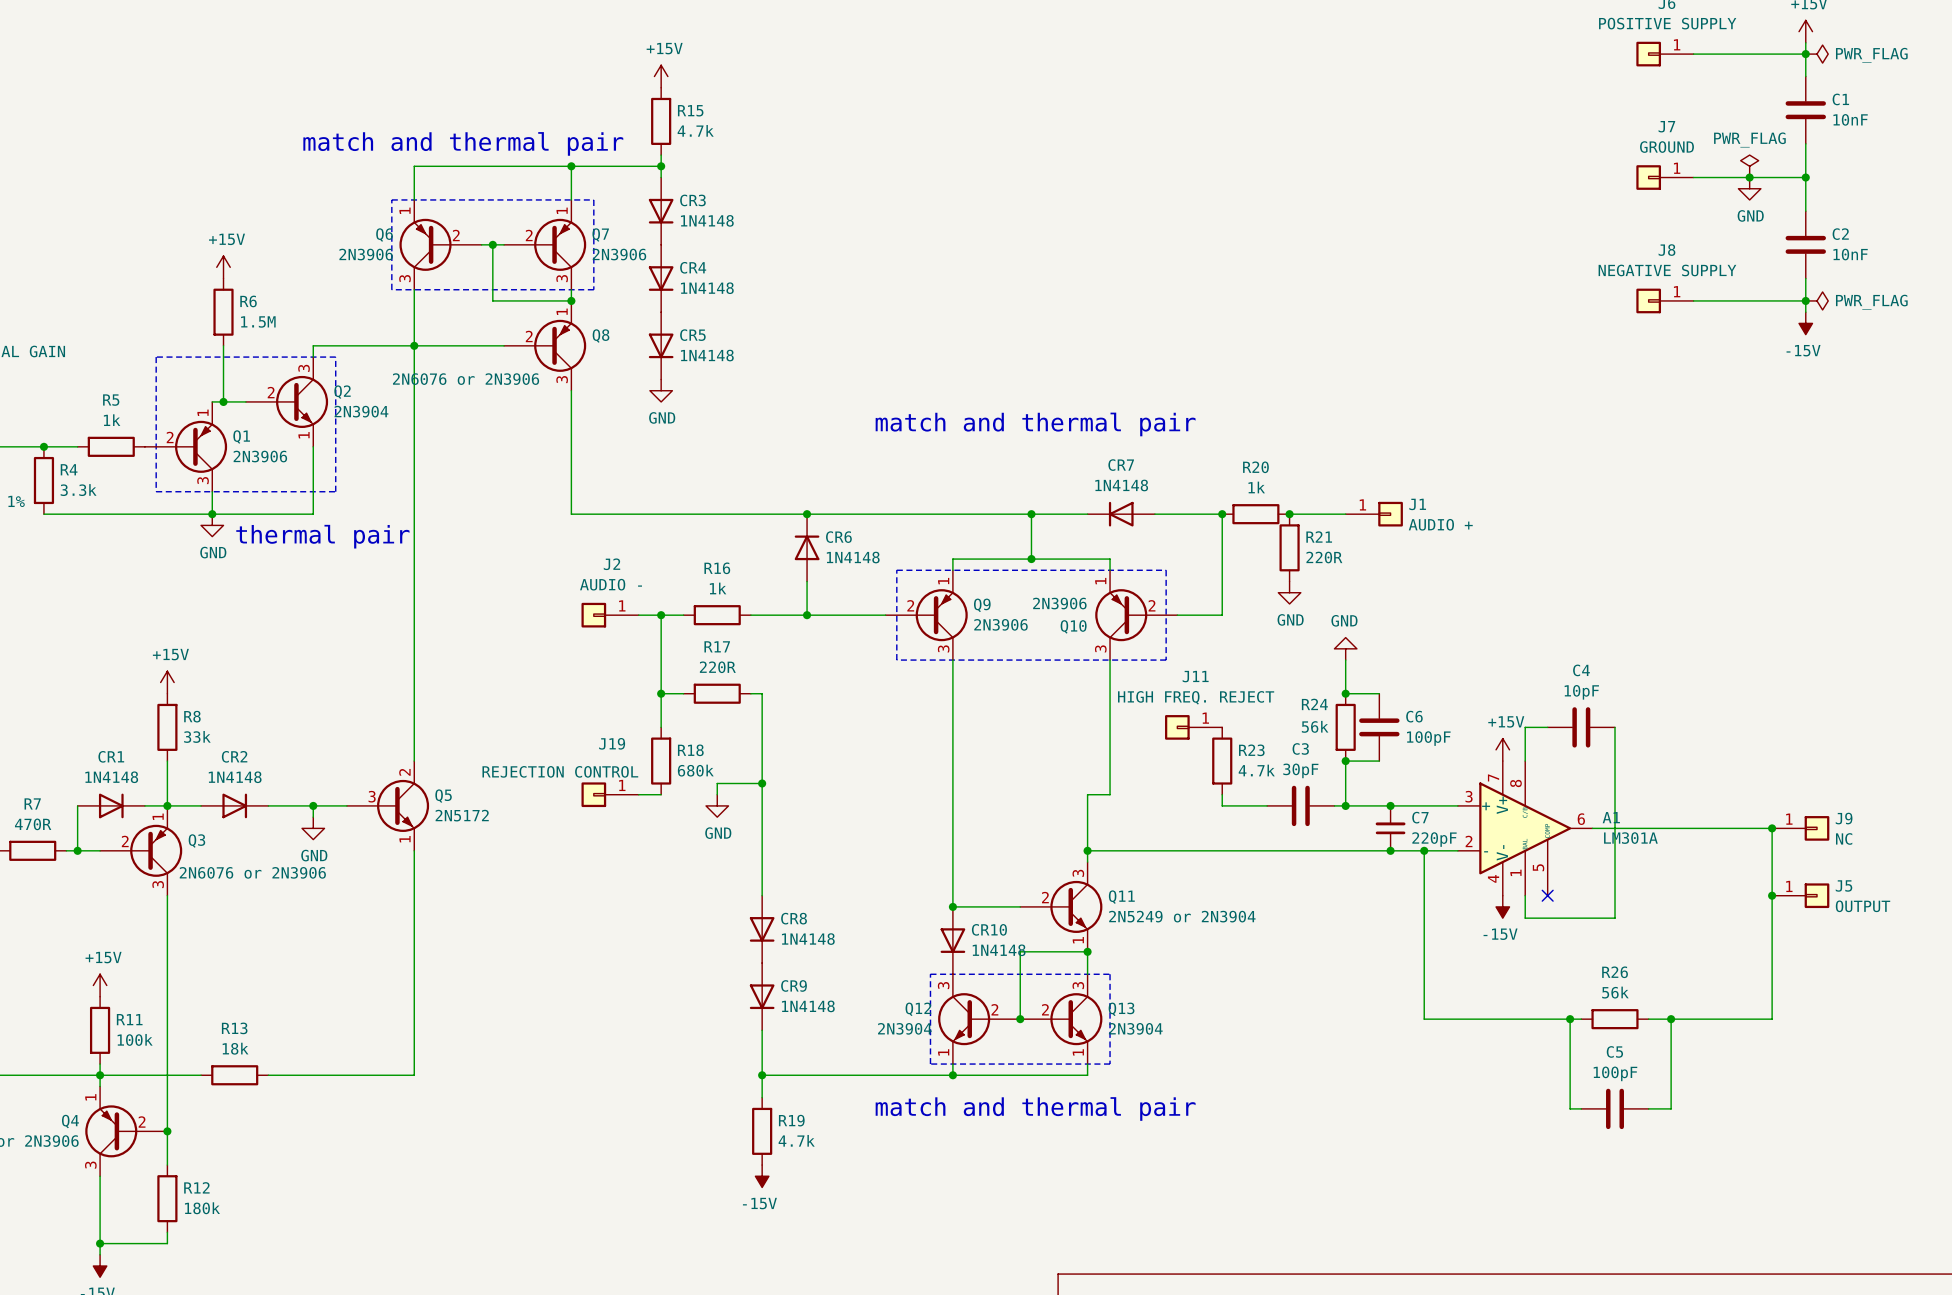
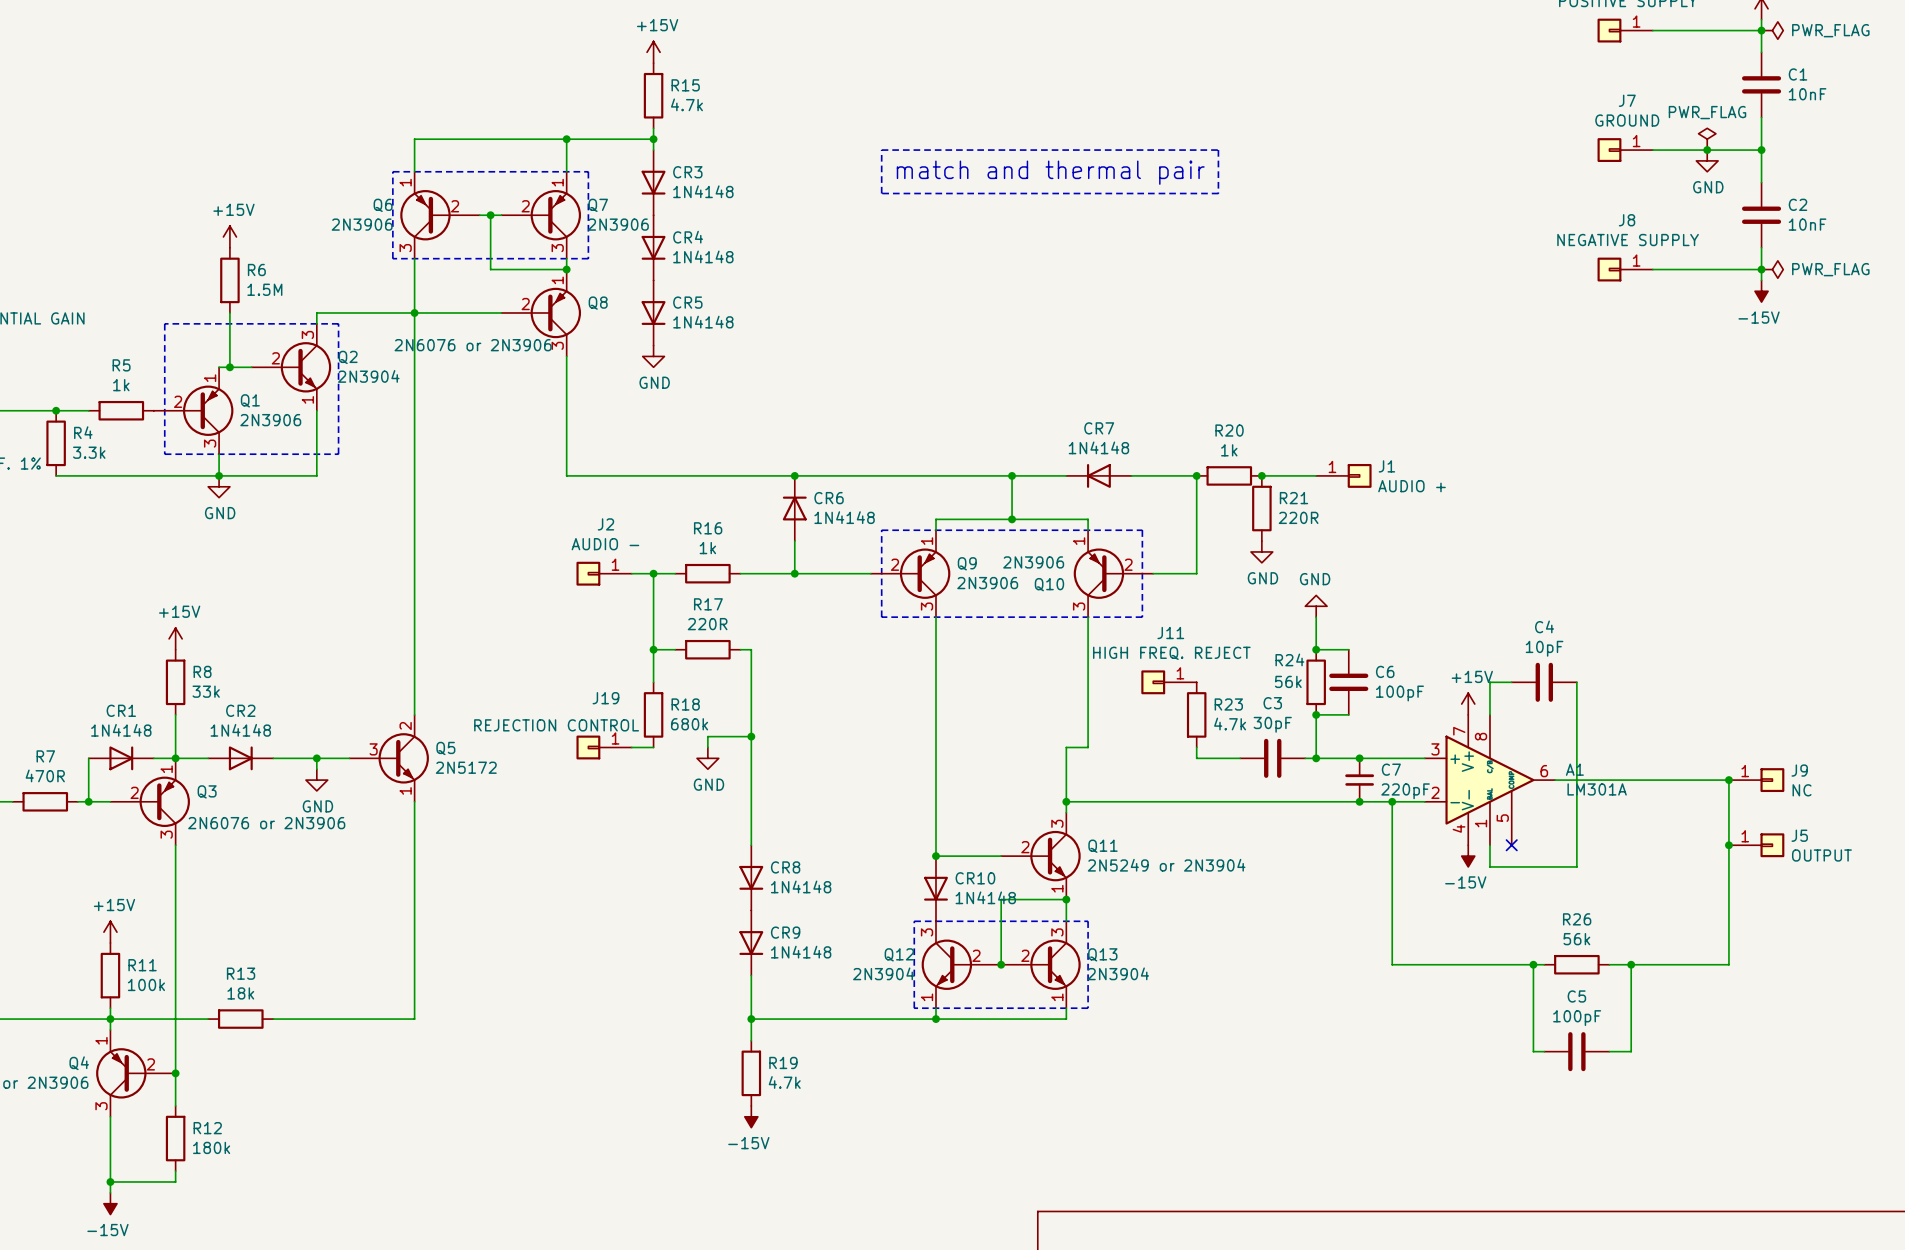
text: match and thermal pair (463, 143) -> none
line: none -> (881, 150) (1218, 150) (1218, 193) (881, 193) (881, 150)
text: none -> match and thermal pair (1050, 172)
text: match and thermal pair (1035, 424) -> none
text: thermal pair (322, 536) -> none
text: match and thermal pair (1035, 1108) -> none

